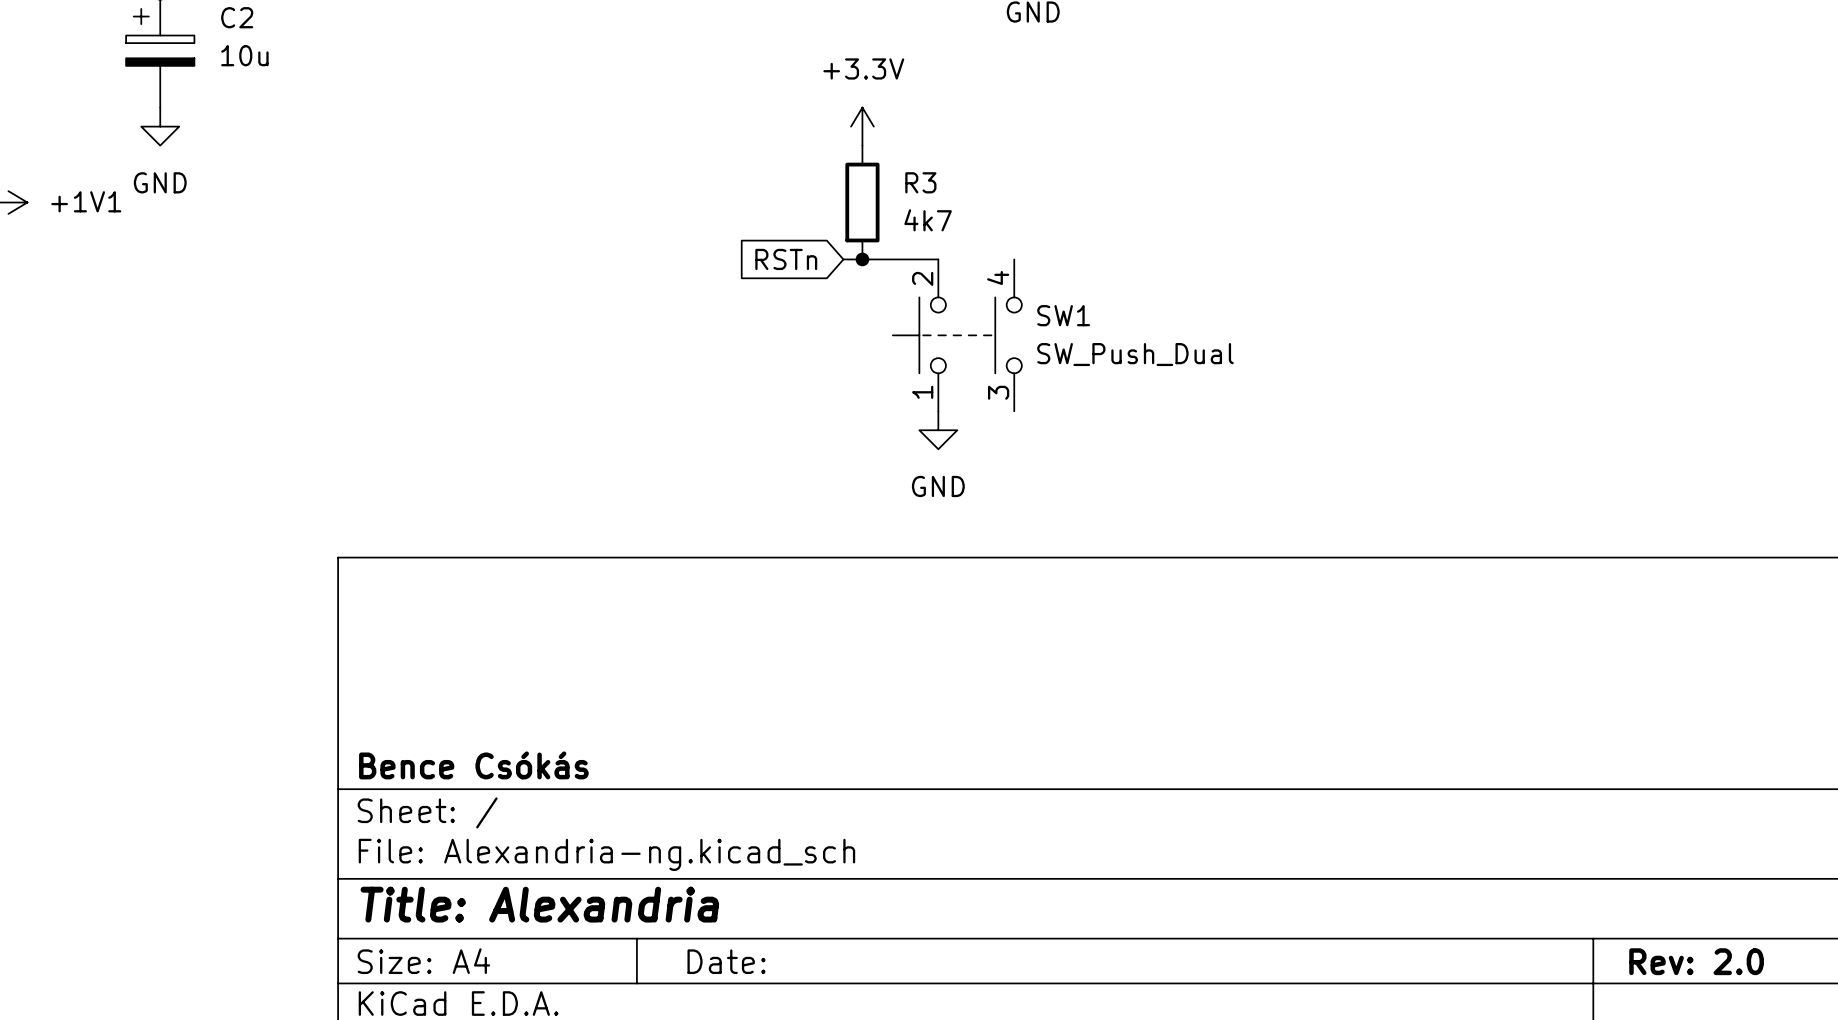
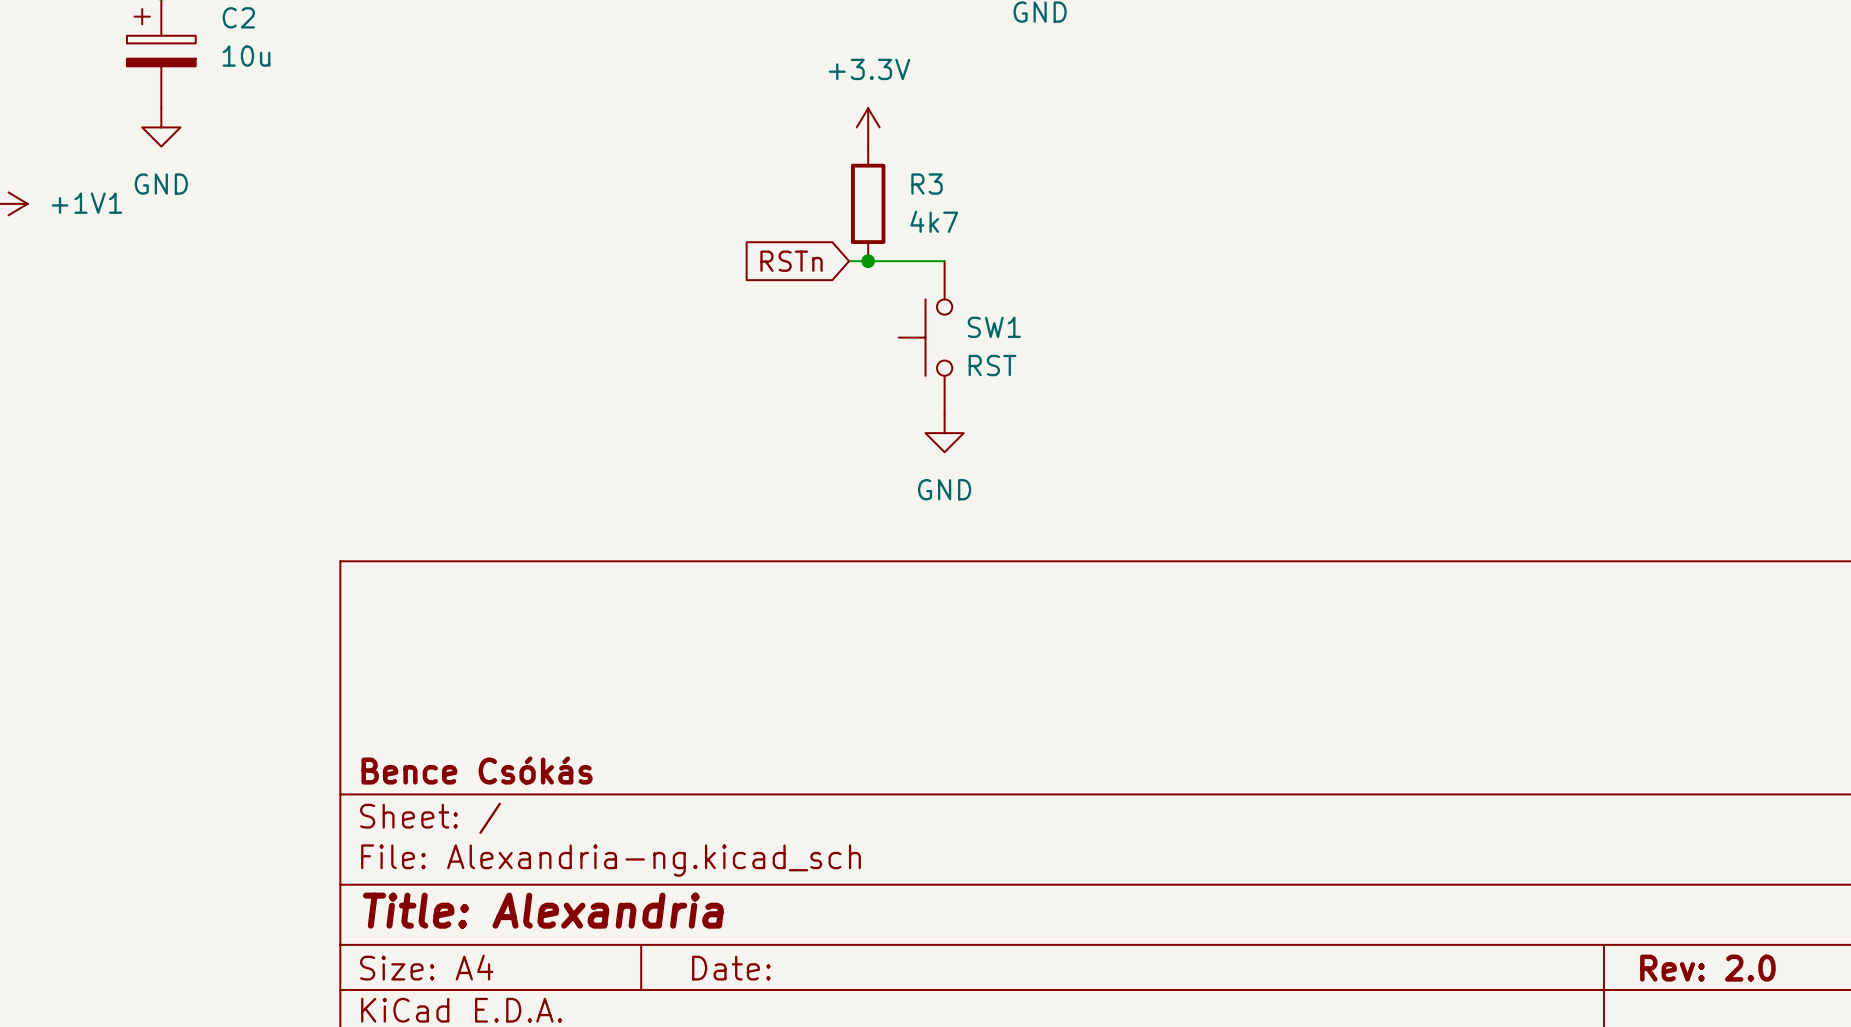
SW1 symbol: [892, 259, 1022, 412] -> [898, 261, 953, 415]
SW1 name position: SW1 (1063, 315) -> SW1 (994, 327)
SW1 value: SW_Push_Dual (1135, 354) -> RST (992, 365)

